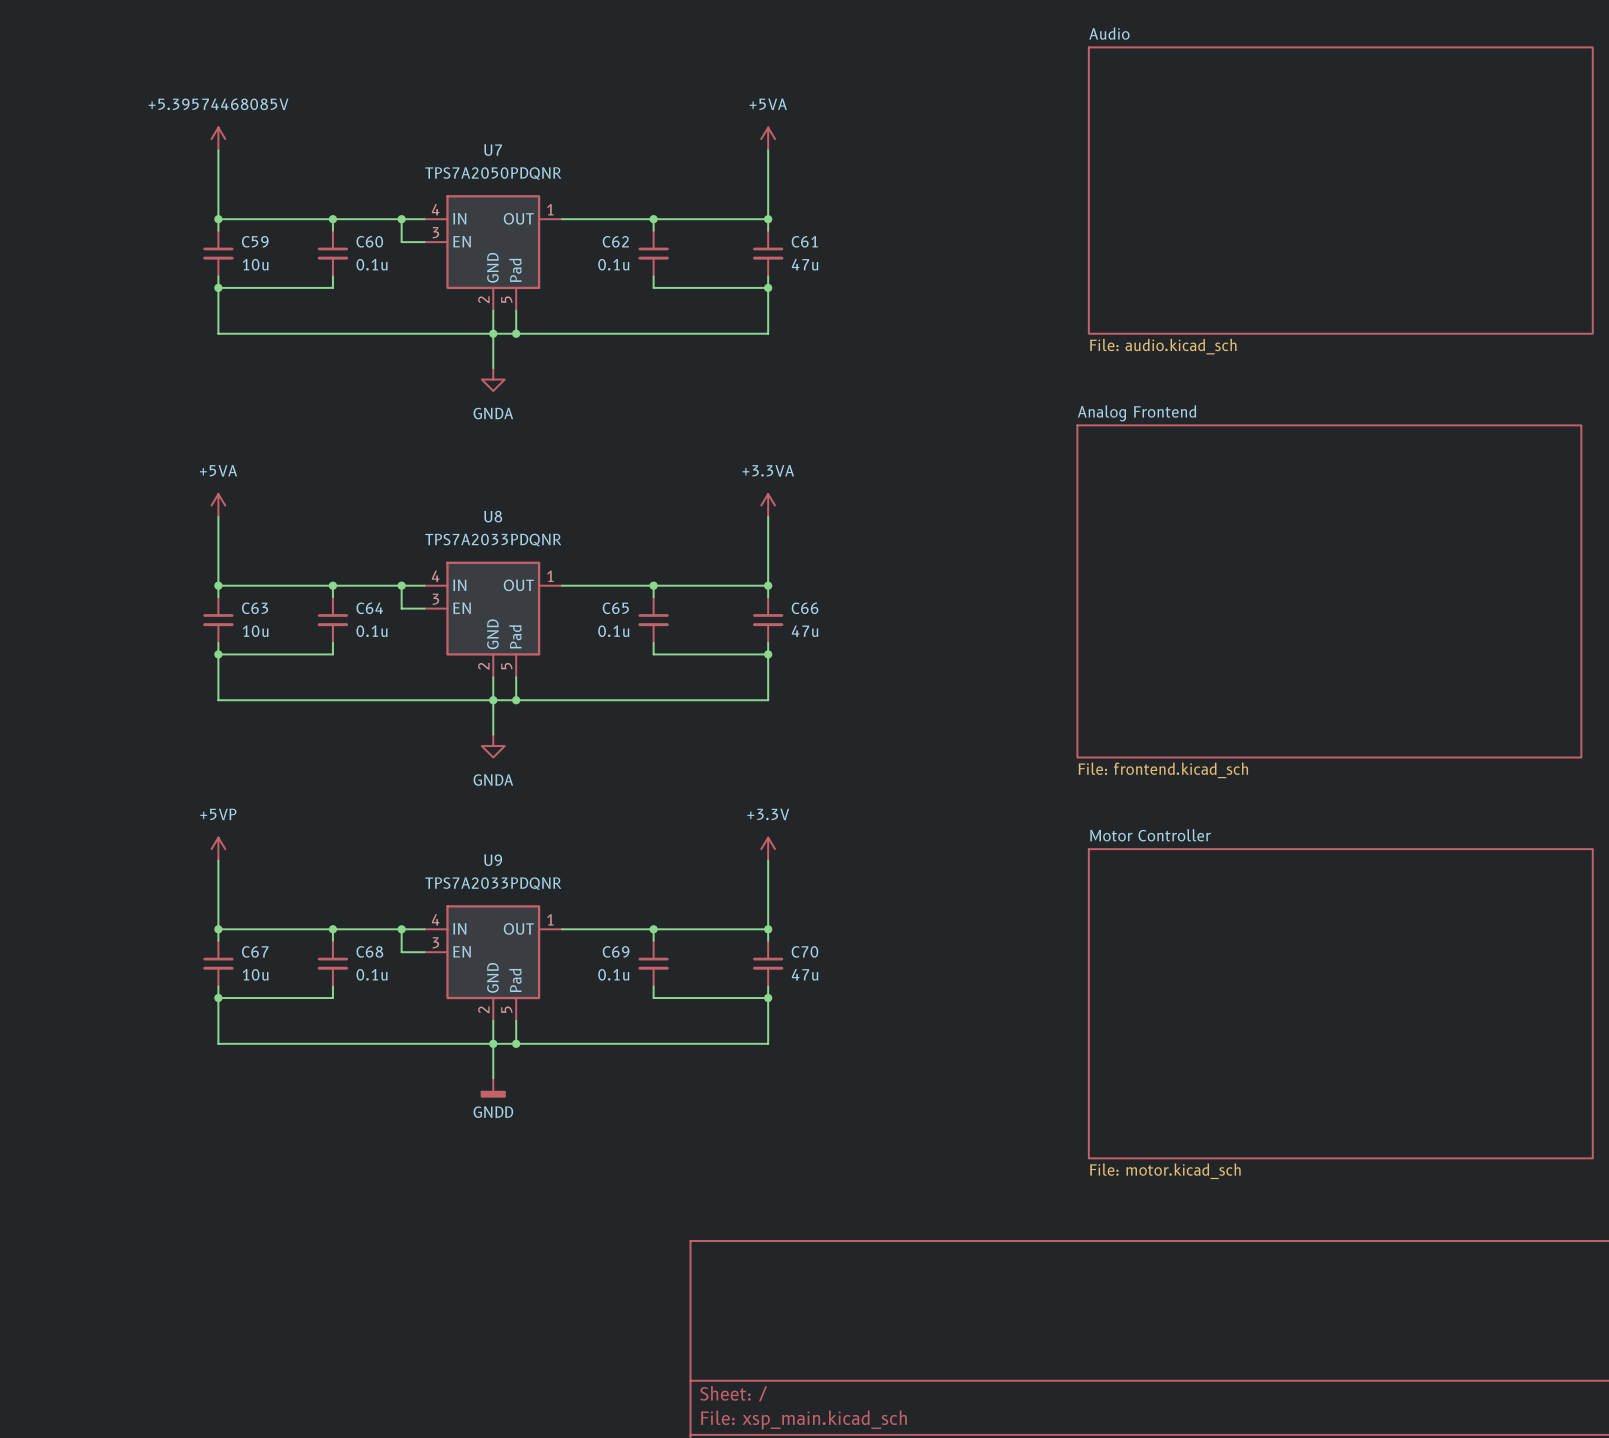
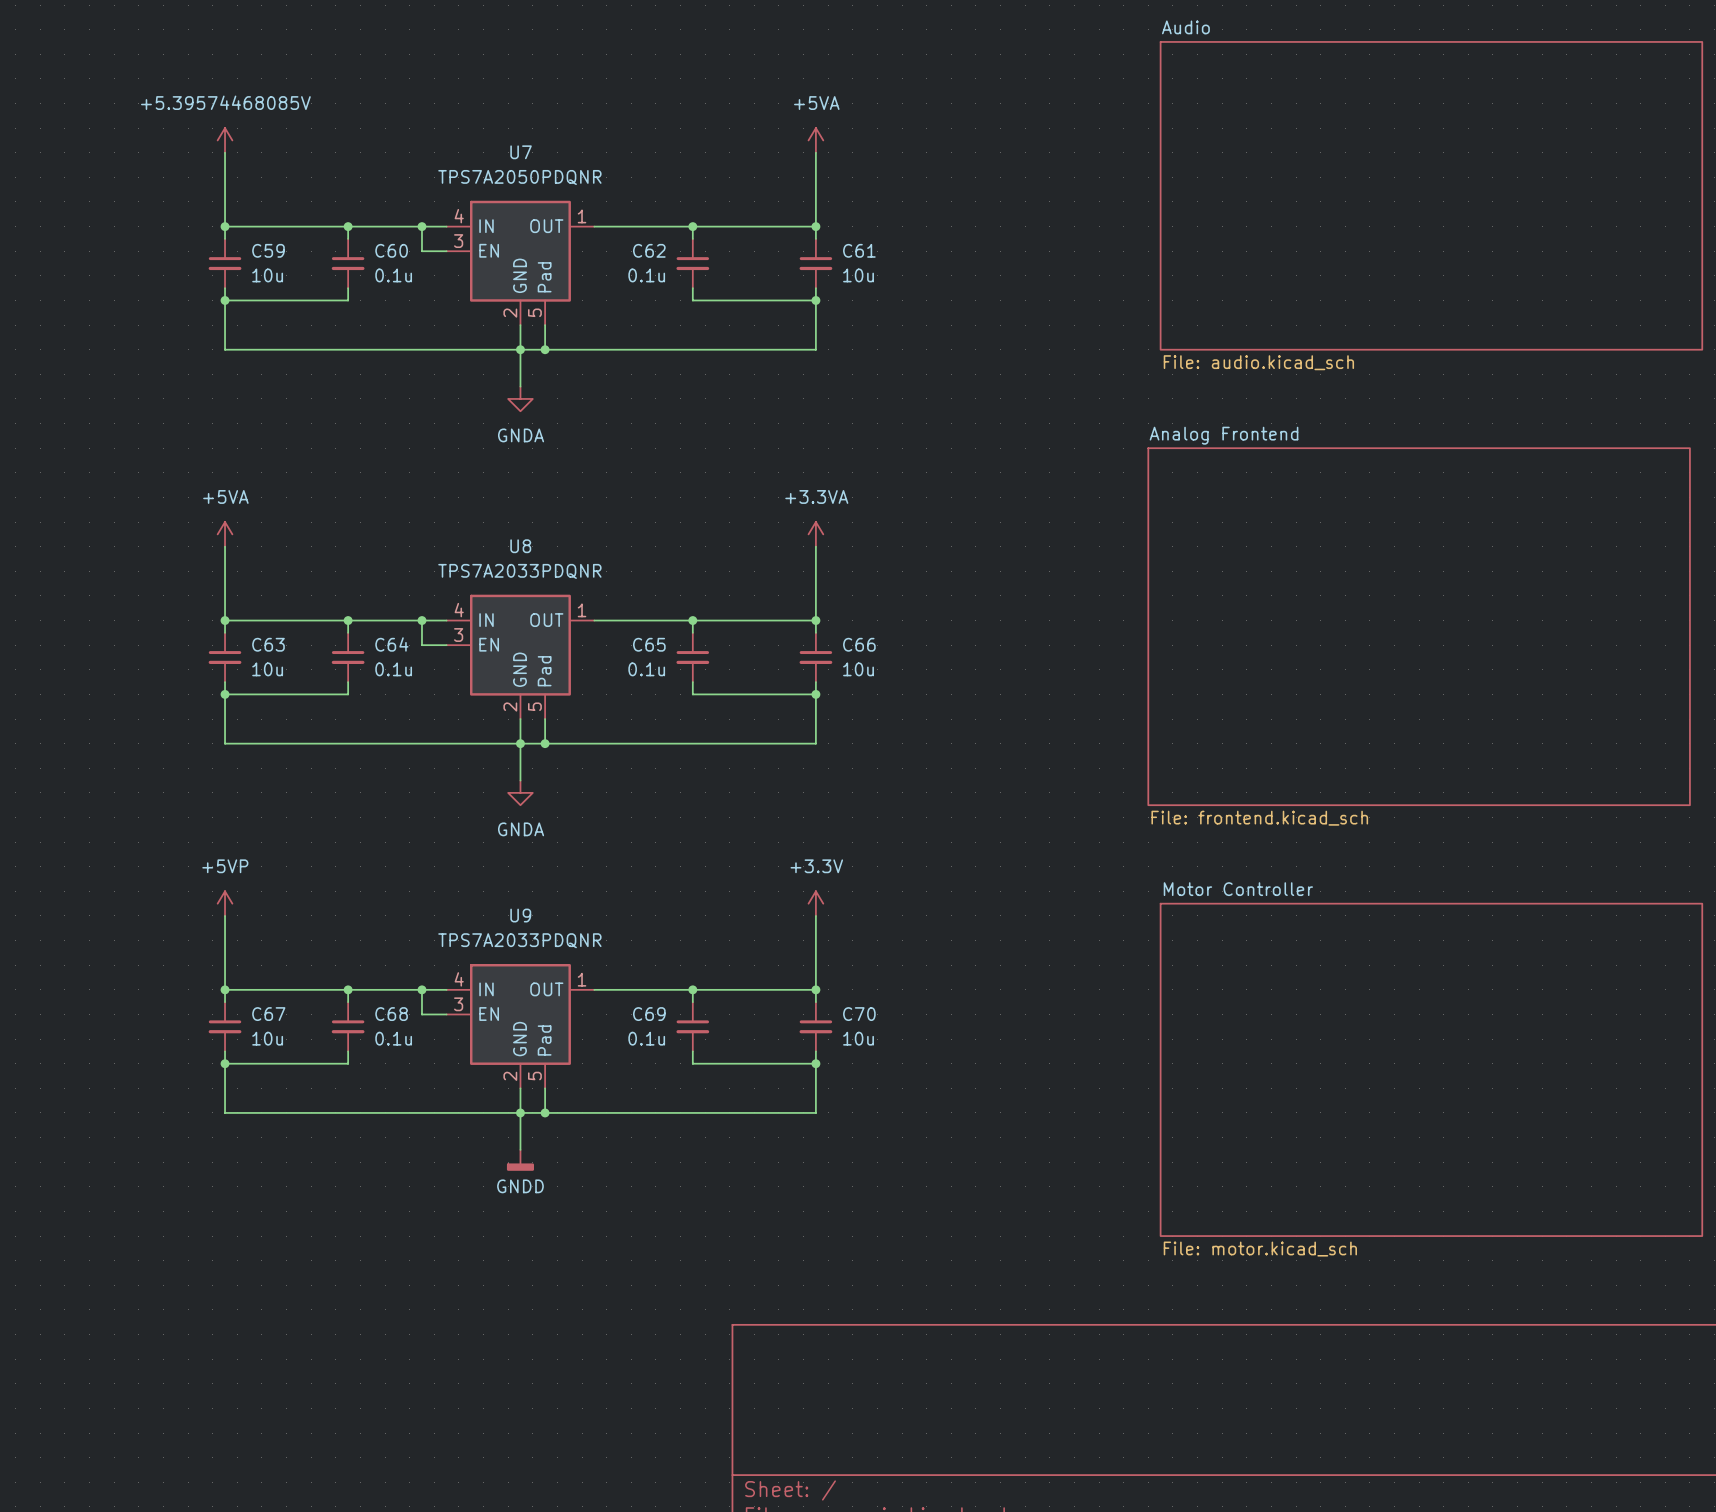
C61 value: 47u (805, 264) -> 10u (858, 275)
C66 value: 47u (805, 631) -> 10u (858, 669)
C70 value: 47u (805, 974) -> 10u (858, 1038)

